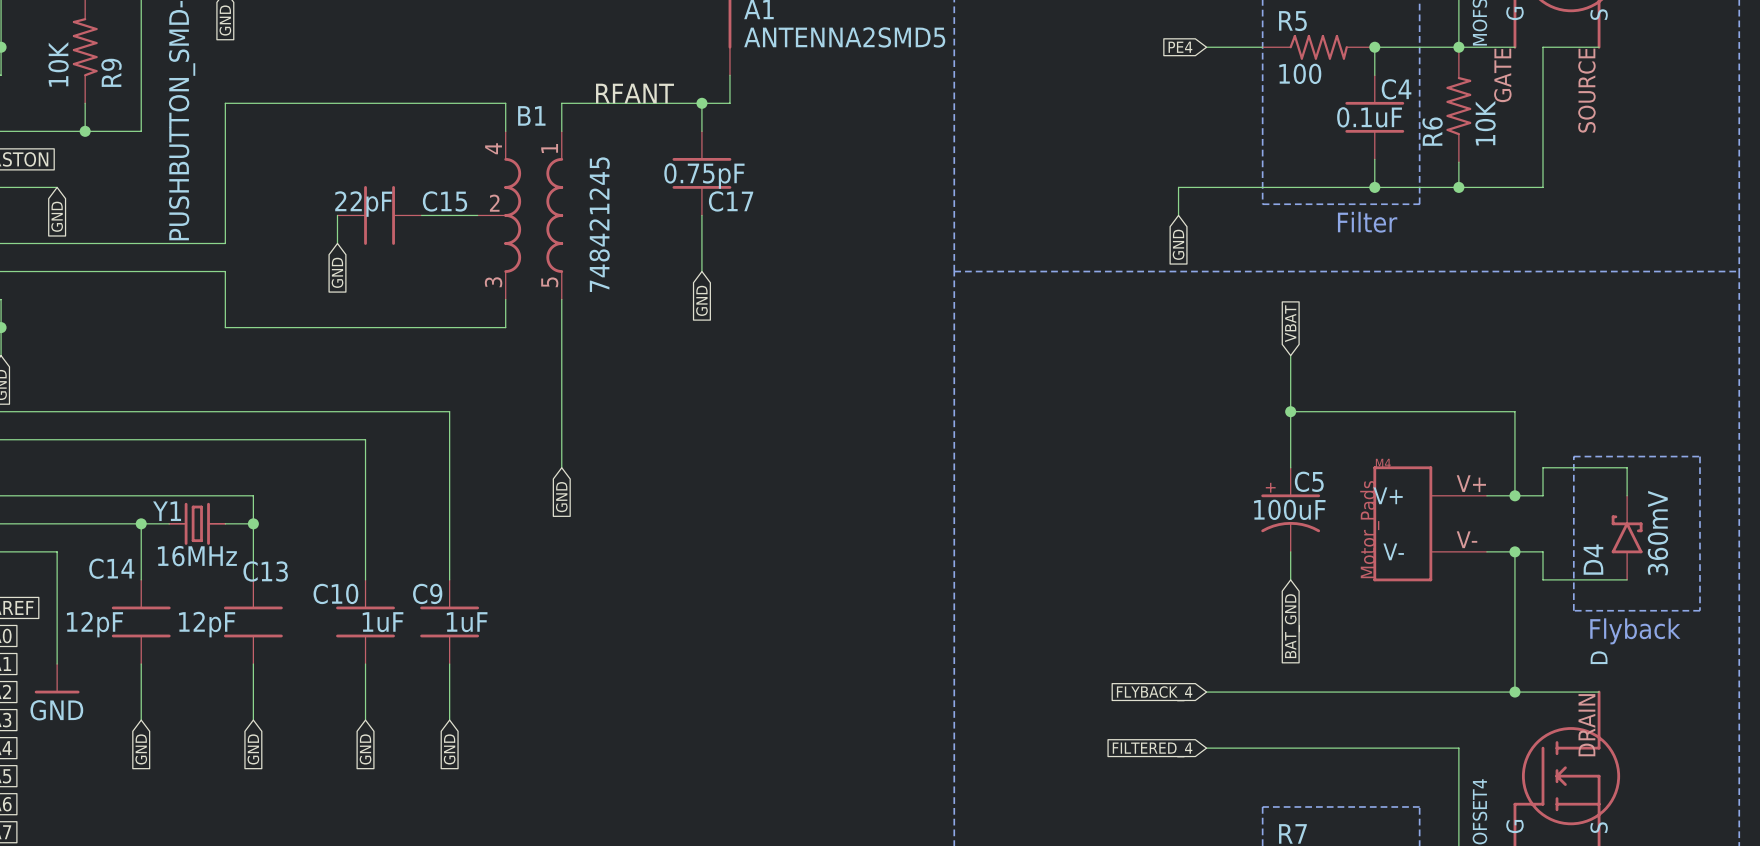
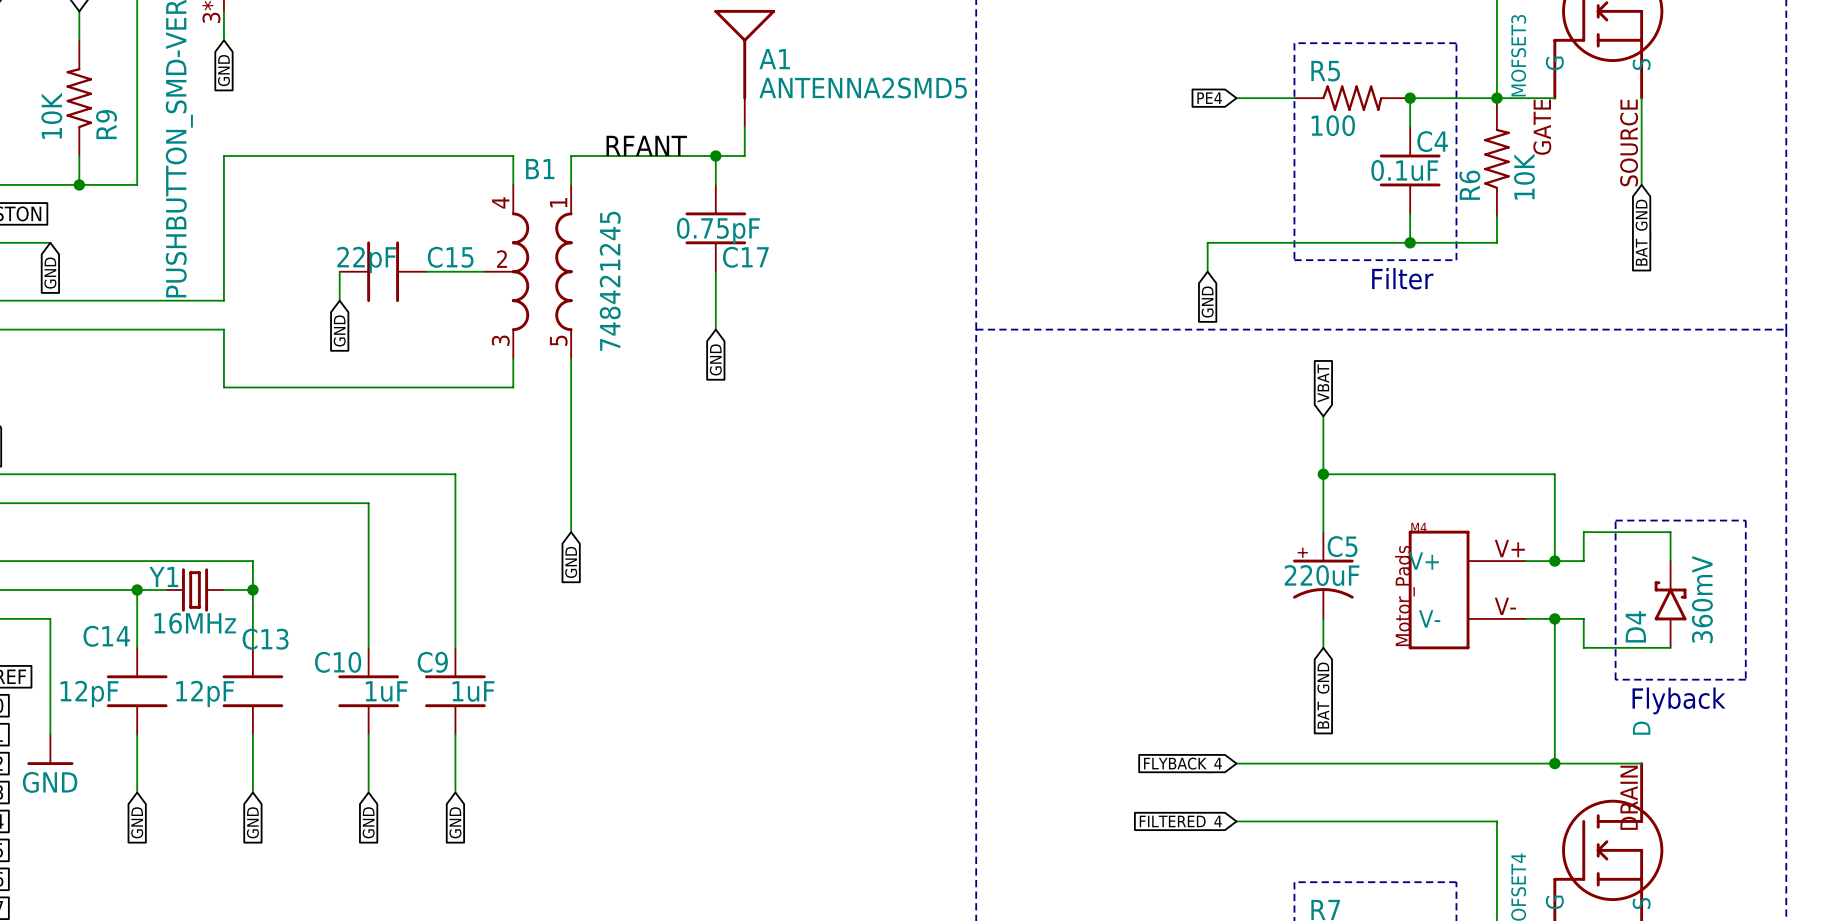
wire: (1599, 47) (1543, 47) (1543, 187) (1458, 187) -> (1641, 98) (1641, 184)
global label: none -> BAT_GND (1643, 232)
junction: (1458, 187) -> none
C5 value: 100uF (1289, 509) -> 220uF (1322, 575)

